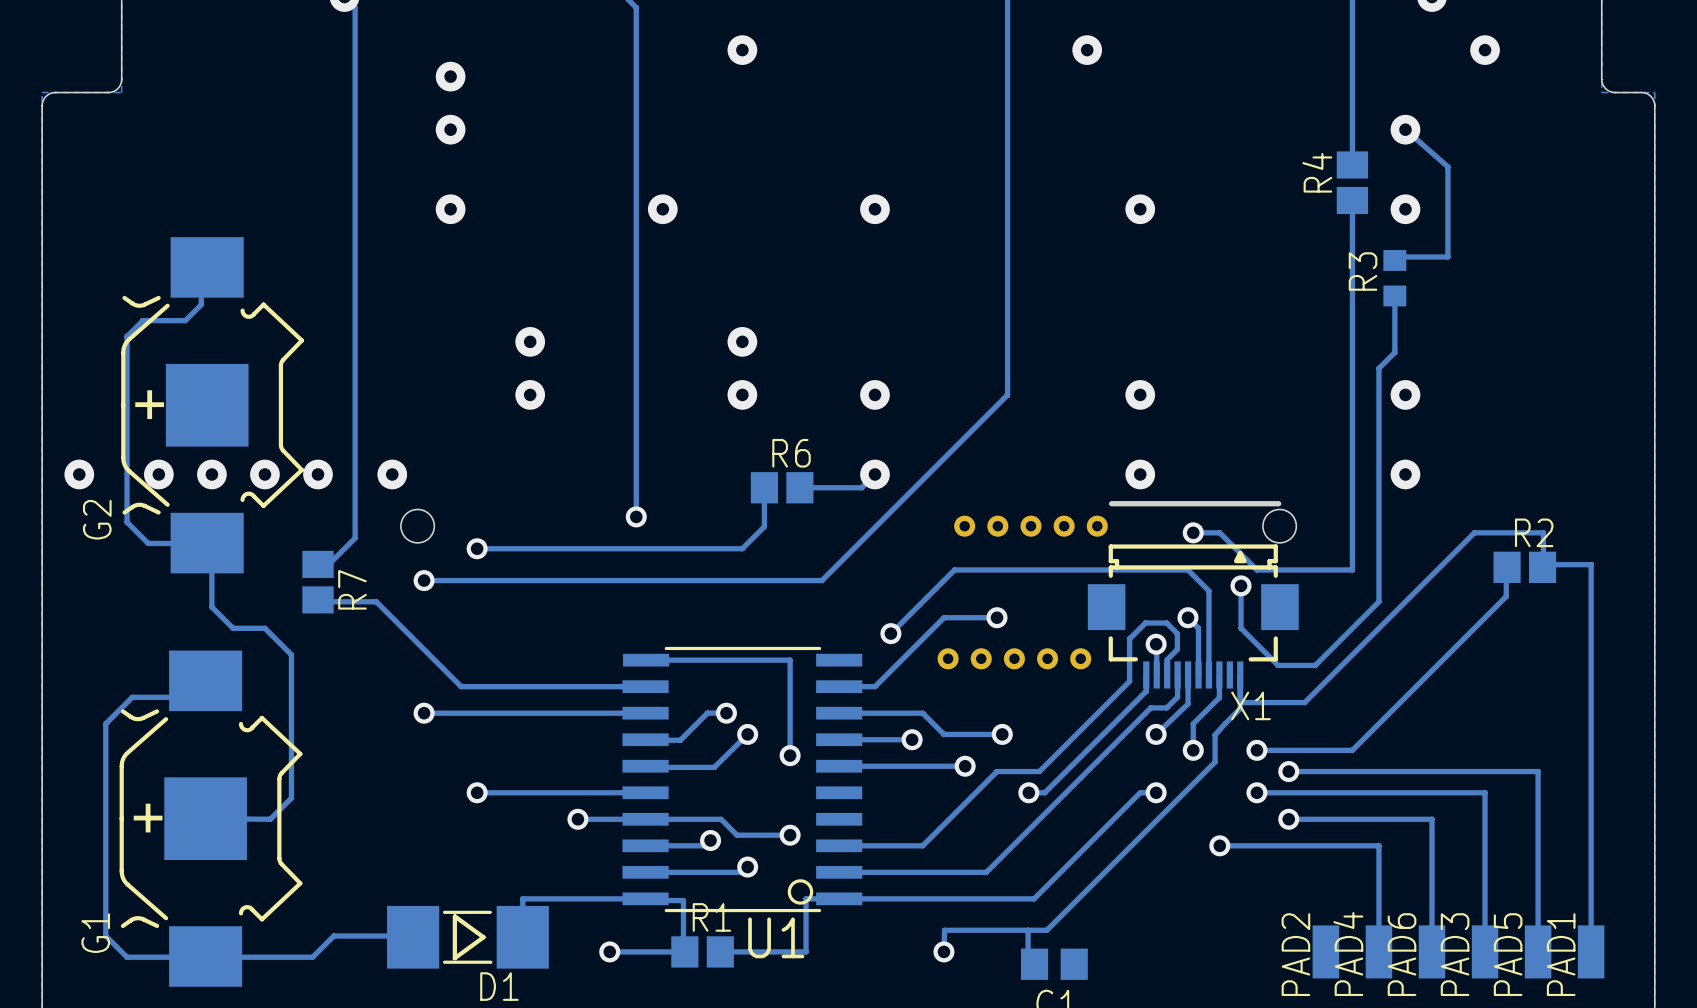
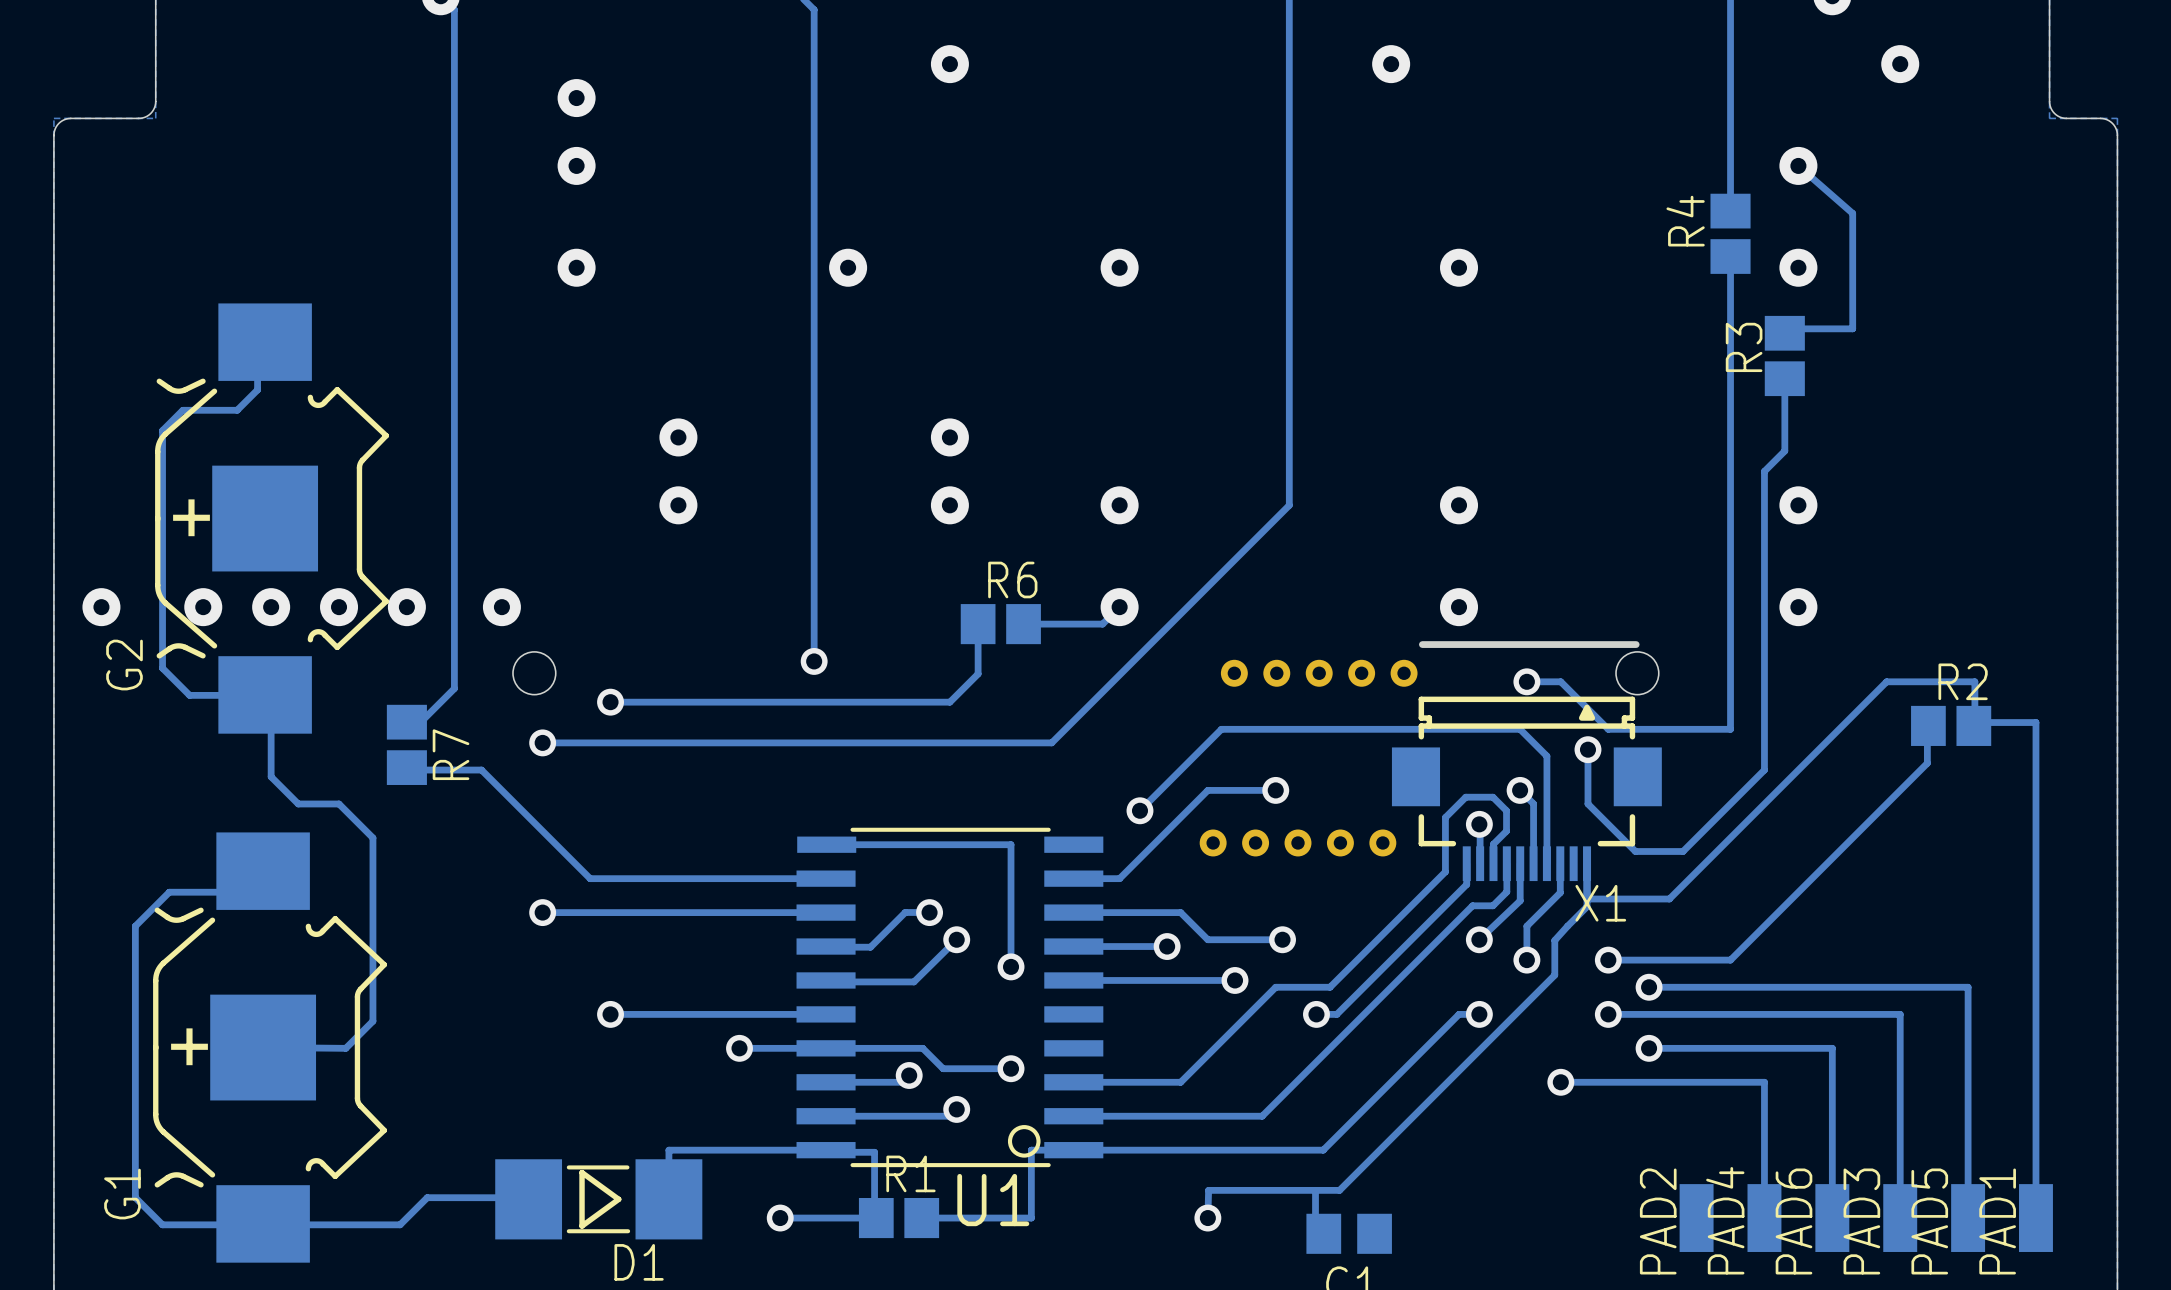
R3 footprint: [1383, 250, 1407, 307] -> [1764, 315, 1805, 397]

